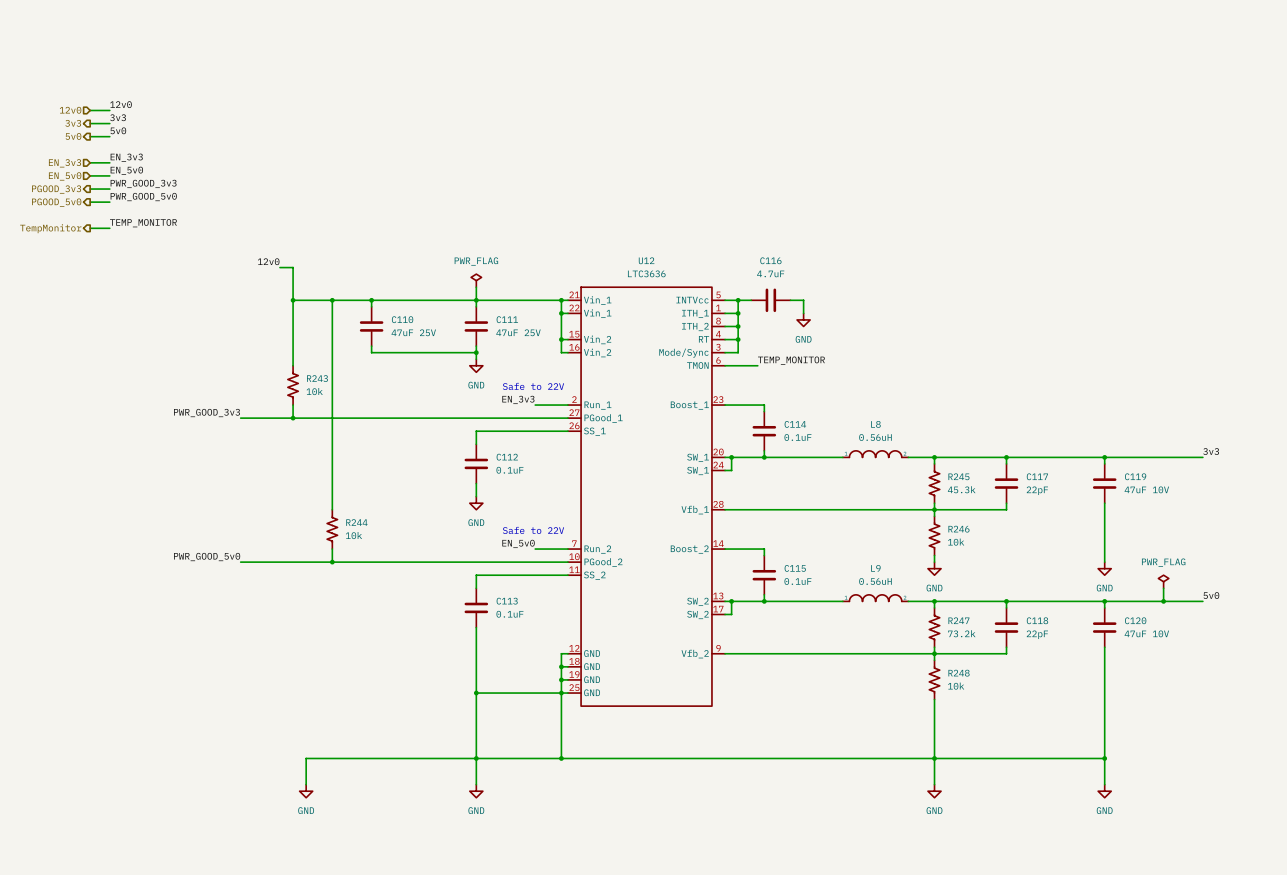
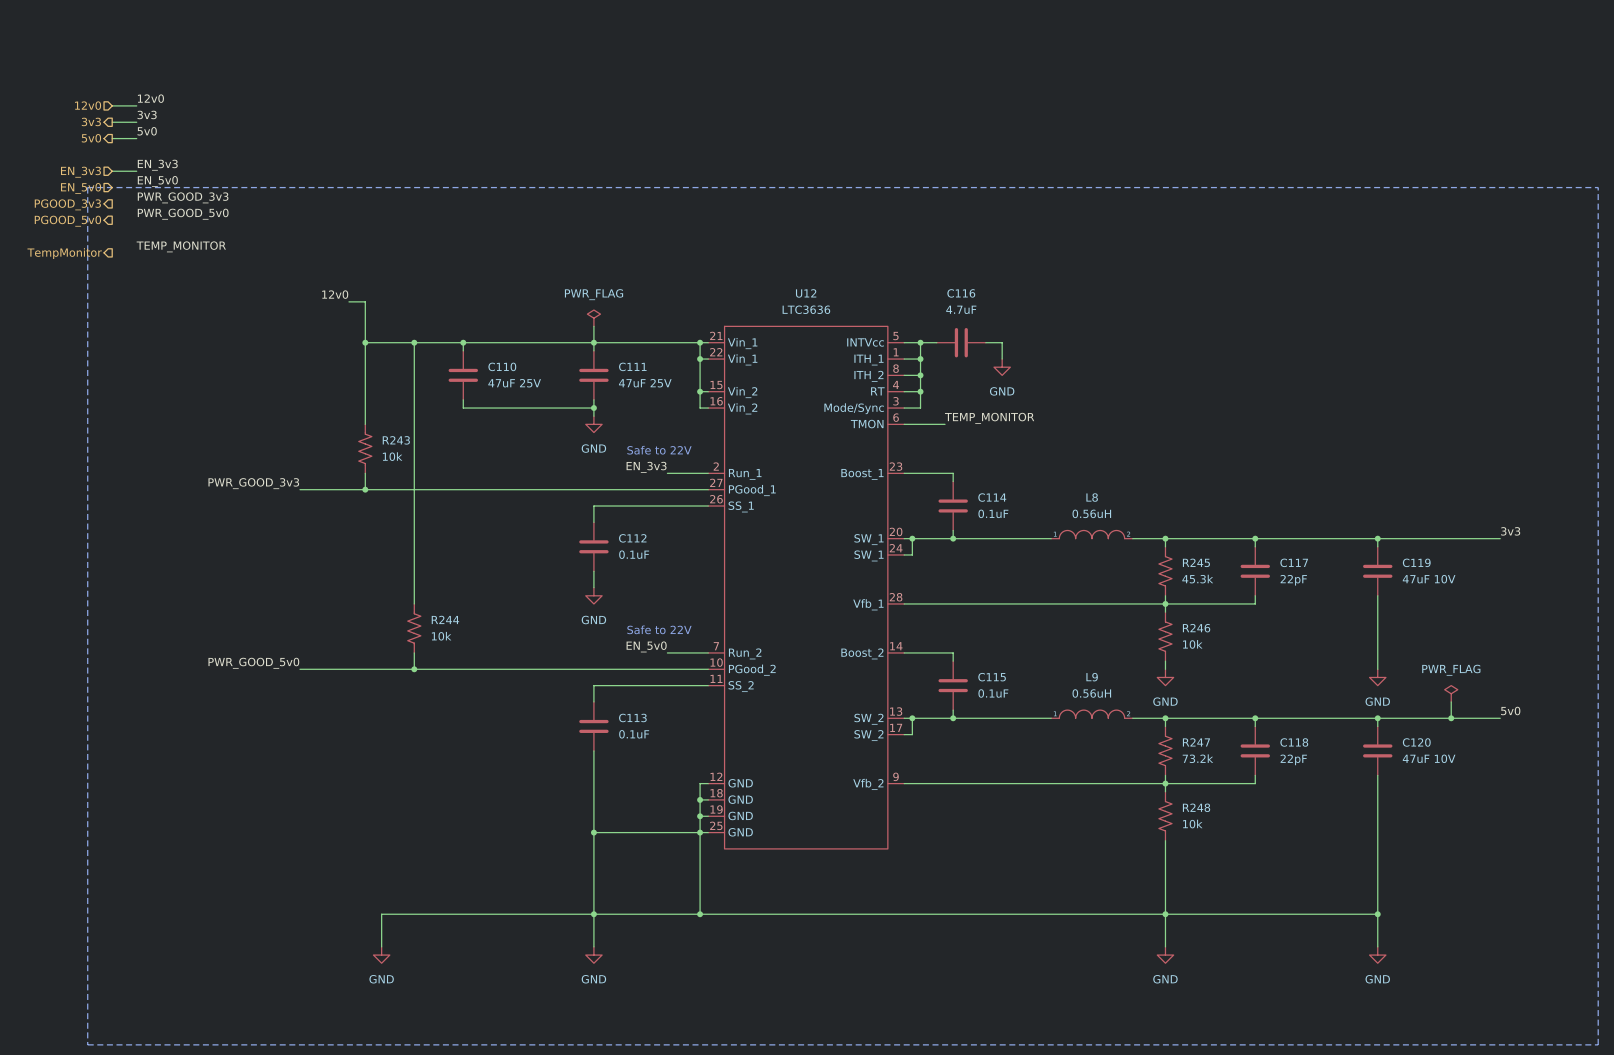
line: none -> (87, 187) (87, 1044) (1598, 1044) (1598, 187) (87, 187)
wire: (90, 189) (109, 189) -> none
wire: (90, 202) (109, 202) -> none
wire: (90, 228) (109, 228) -> none

